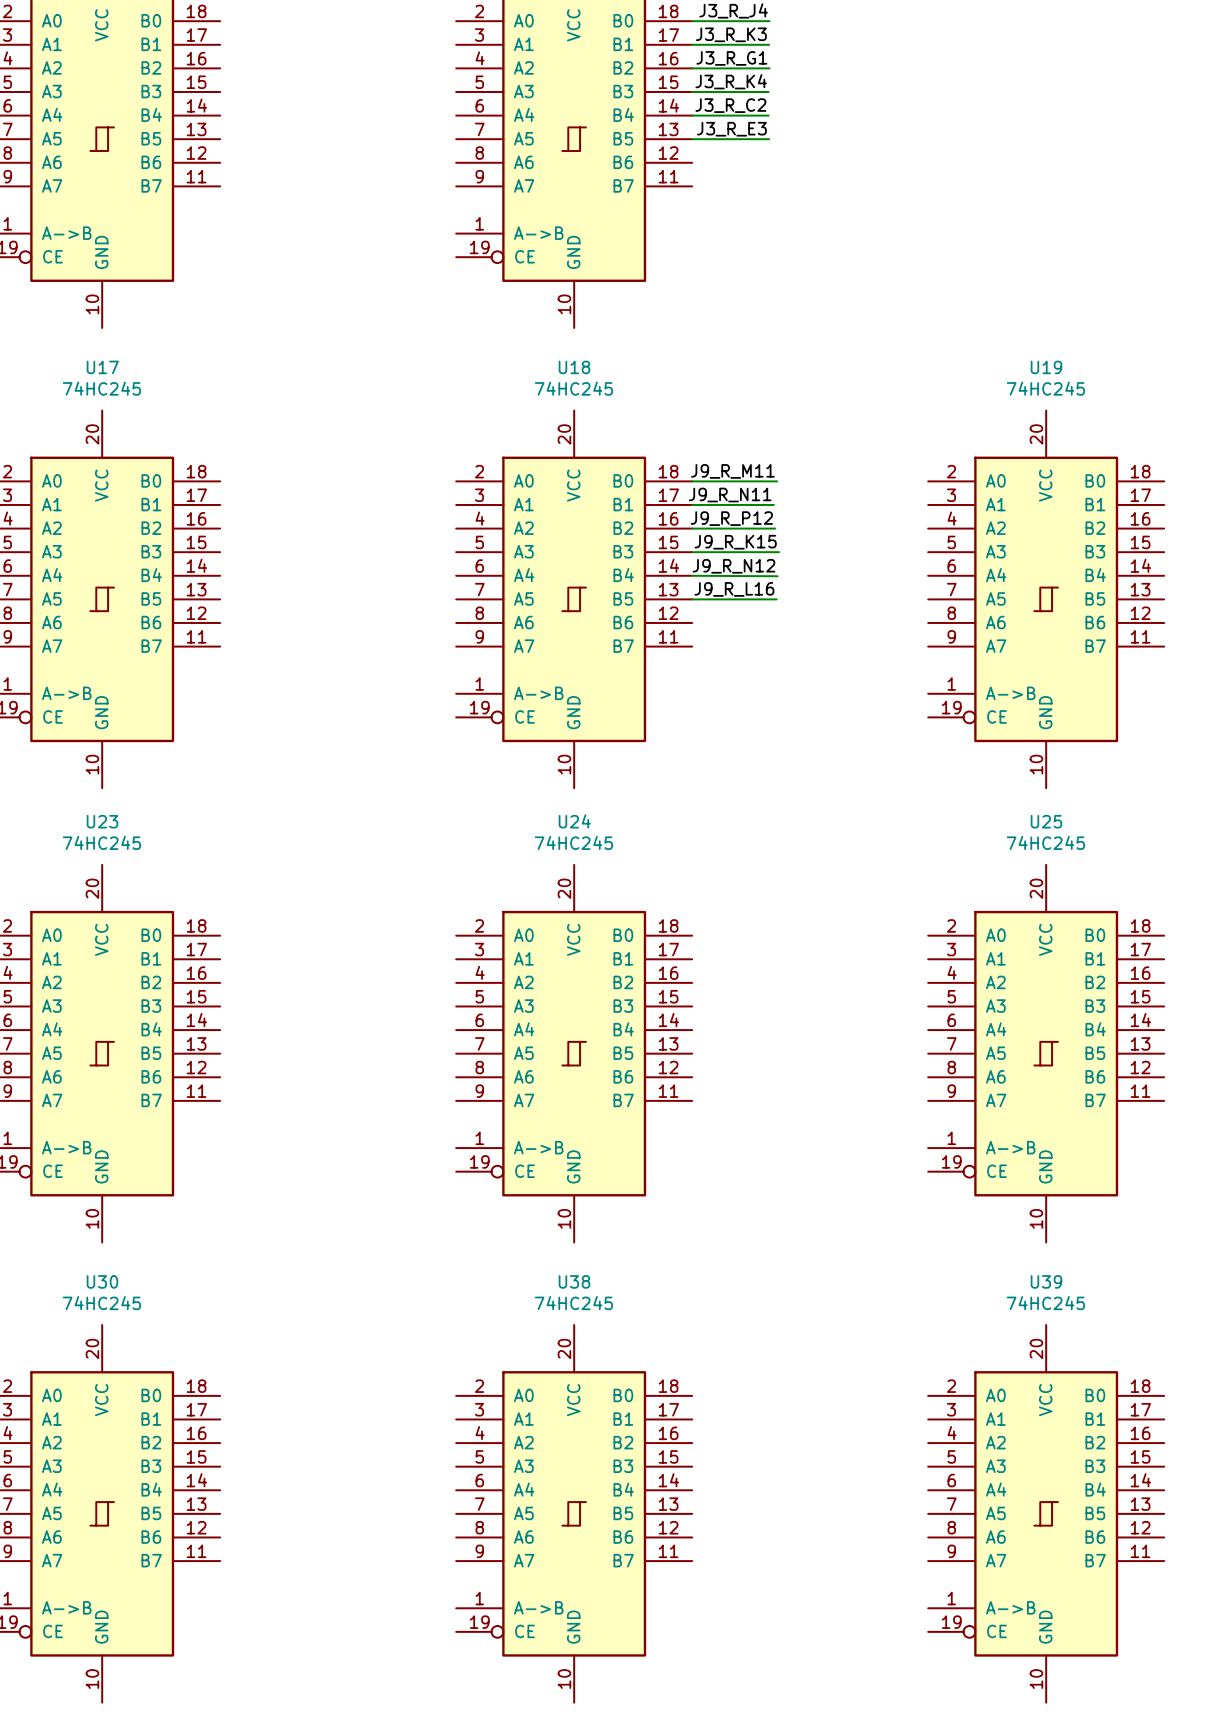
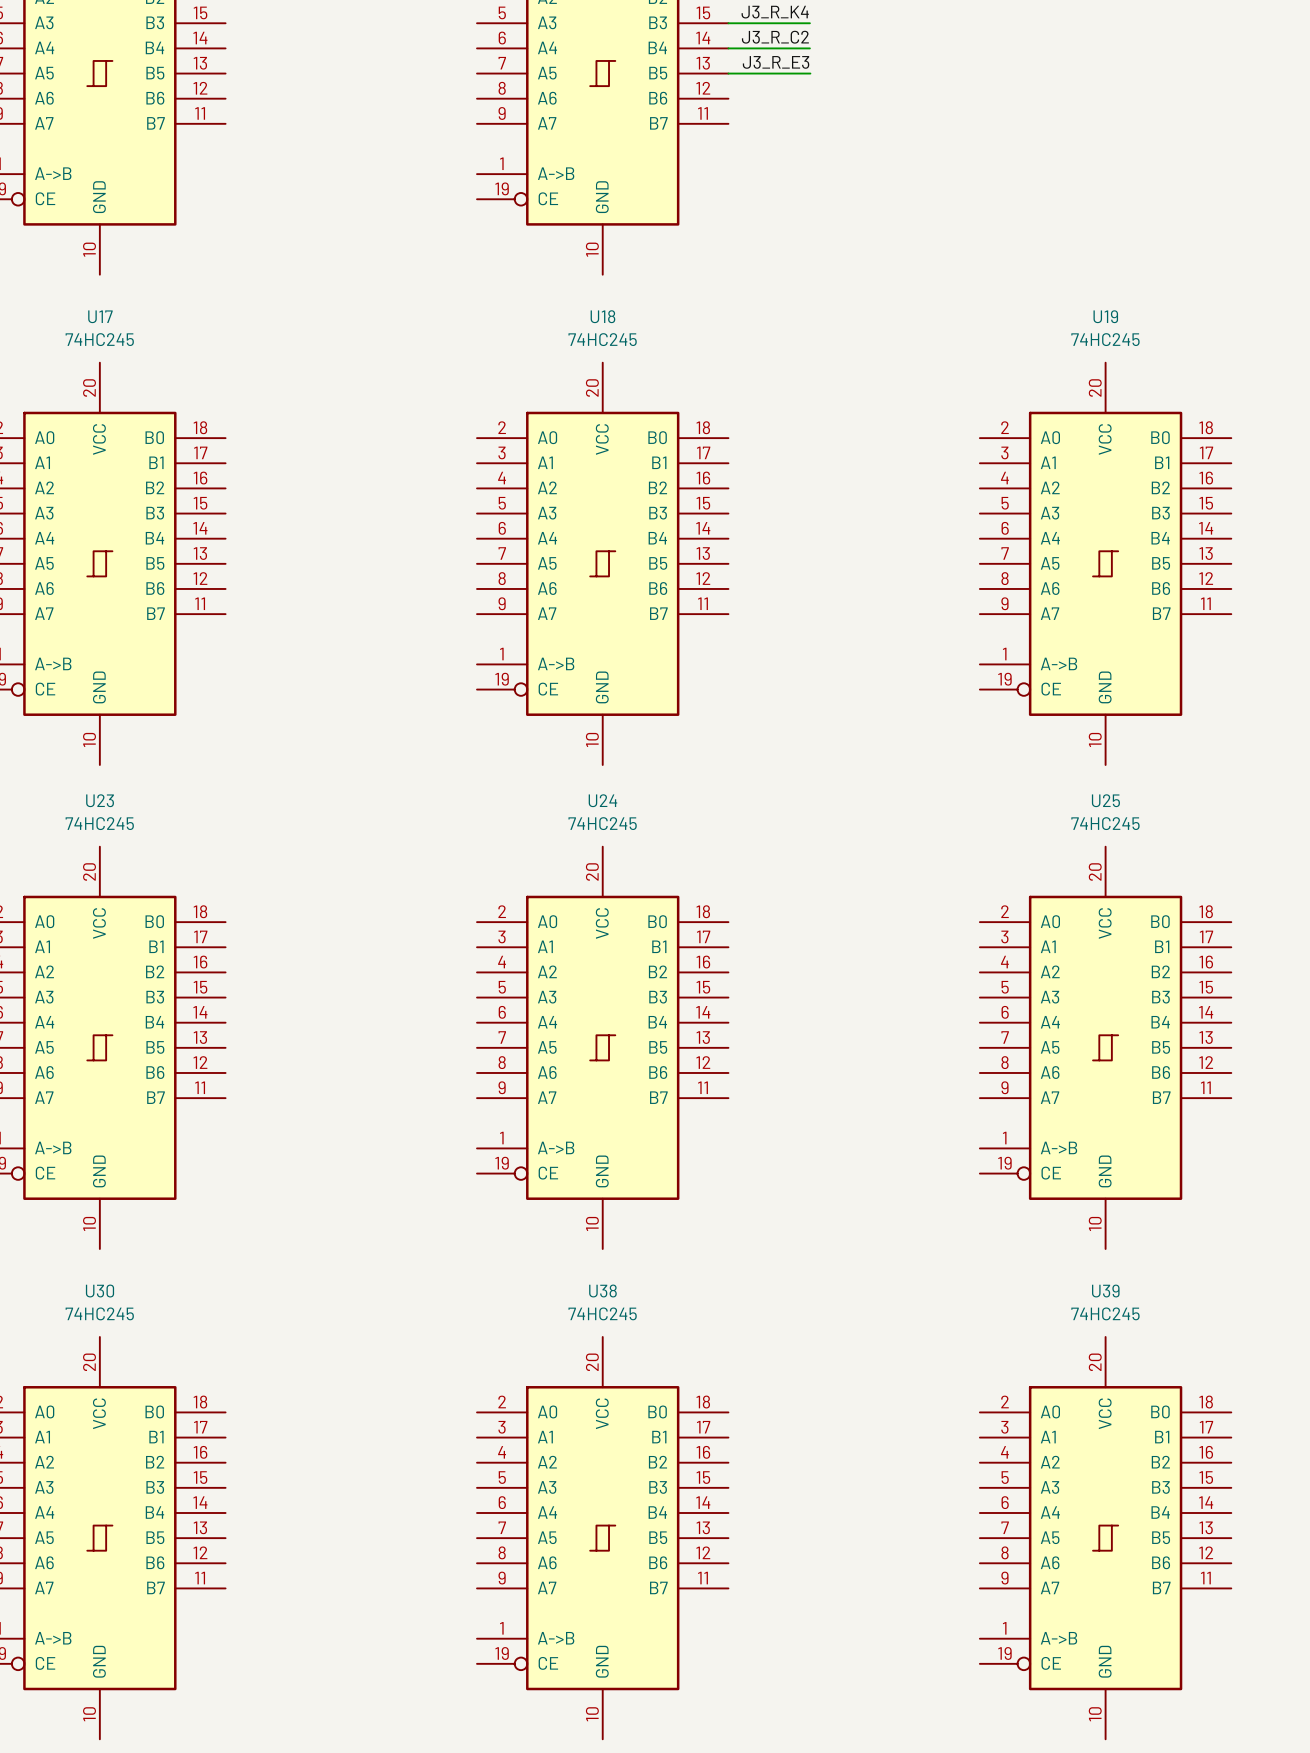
label: J9_R_M11 (732, 471) -> none
wire: (692, 481) (777, 481) -> none
label: J9_R_N11 (730, 495) -> none
wire: (692, 504) (773, 504) -> none
label: J9_R_P12 (731, 518) -> none
wire: (692, 528) (775, 528) -> none
label: J9_R_K15 (735, 542) -> none
wire: (692, 552) (779, 552) -> none
label: J9_R_N12 (733, 566) -> none
wire: (692, 575) (777, 576) -> none
label: J9_R_L16 (734, 589) -> none
wire: (692, 599) (776, 599) -> none

